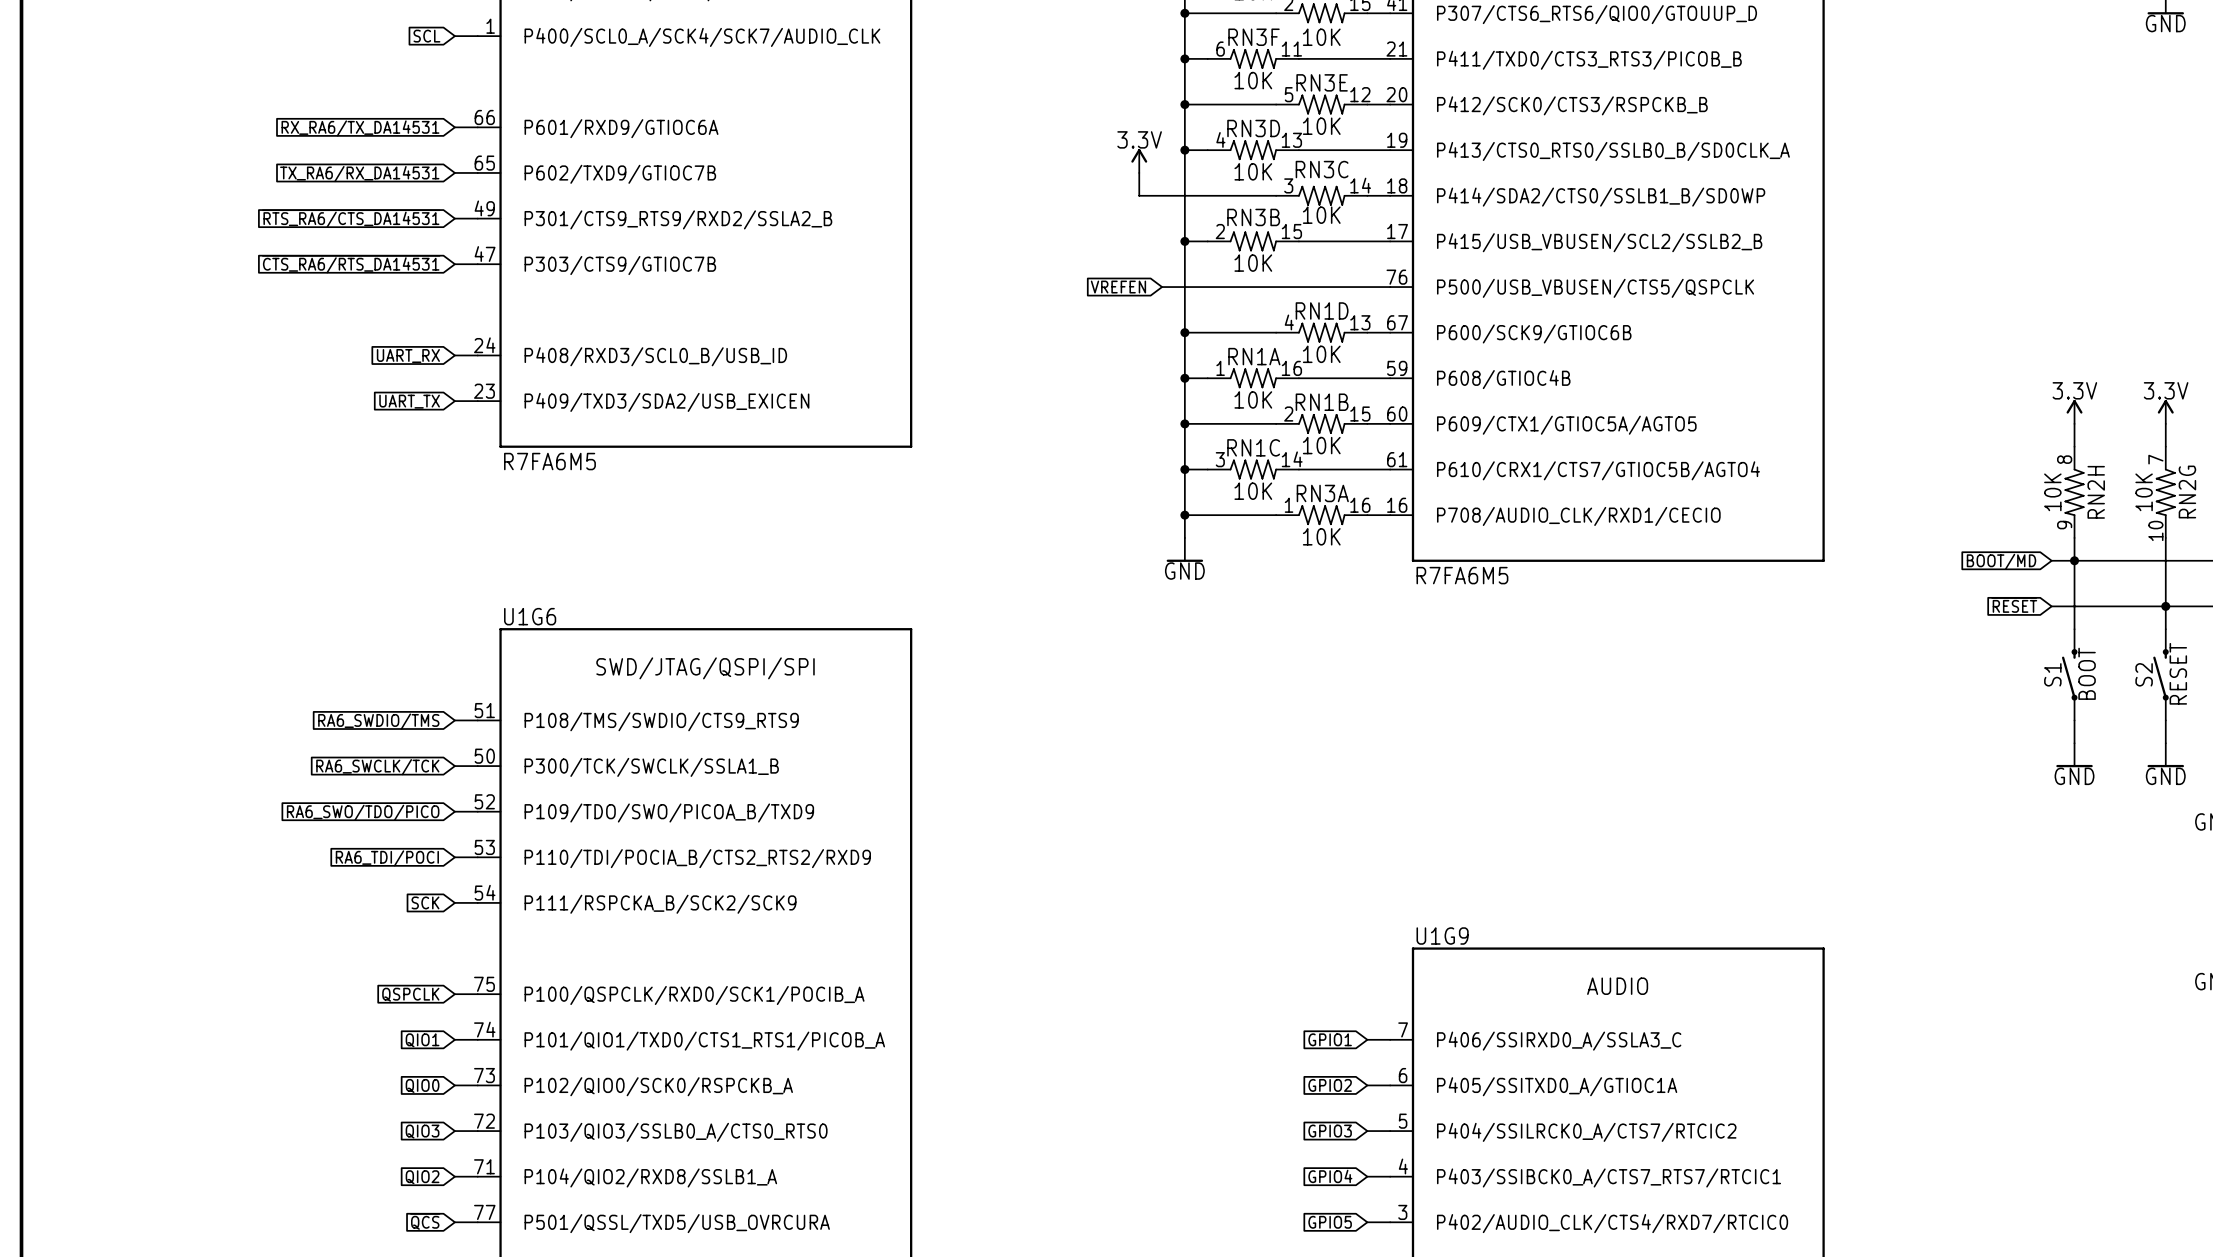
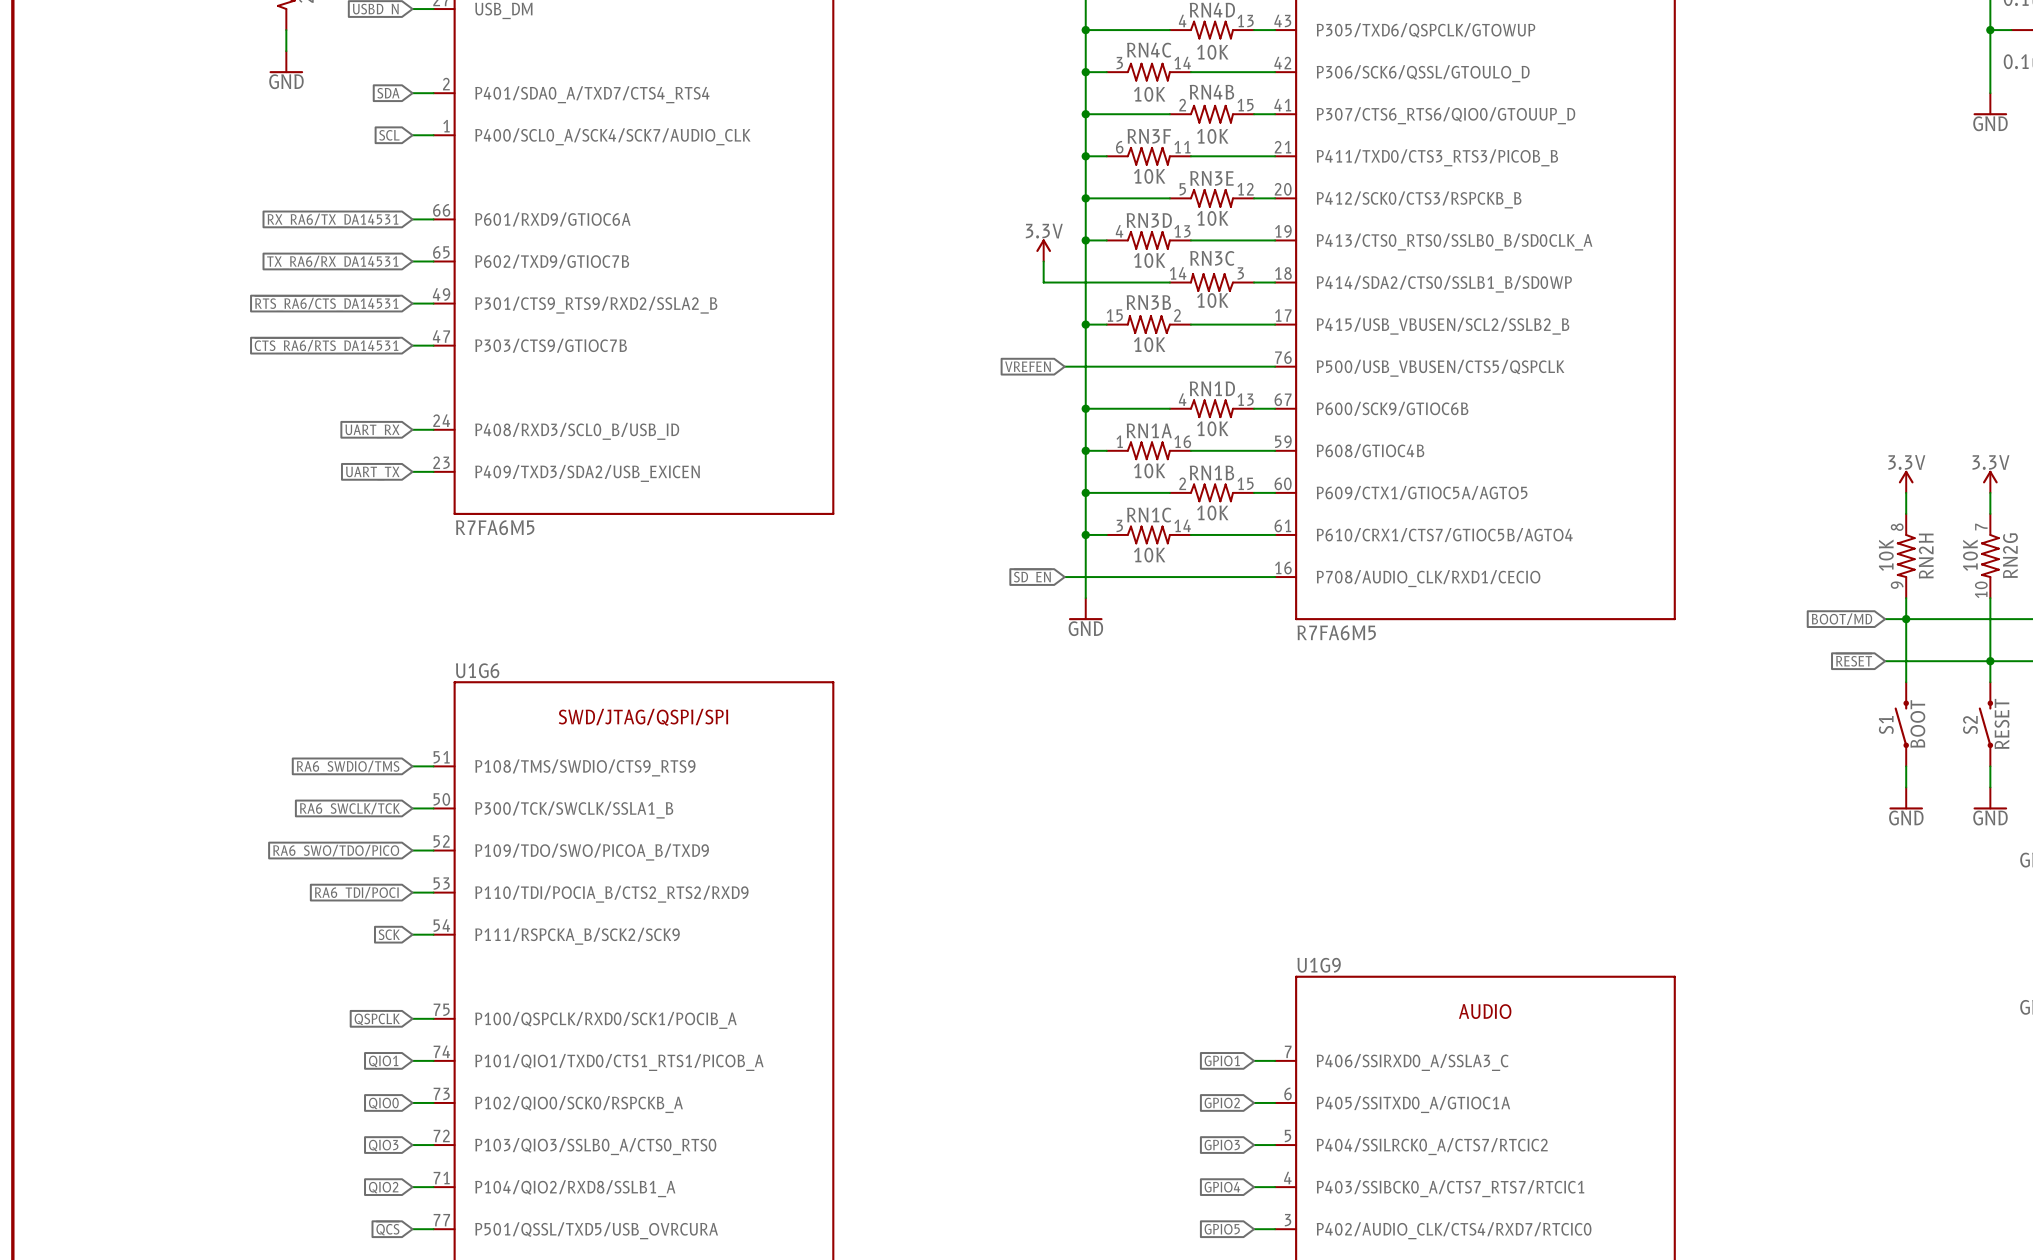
RN3C rotation: 0° (1321, 195) -> 180° (1211, 282)
RN3B rotation: 0° (1253, 241) -> 180° (1148, 324)
global label: none -> ~{SD_EN} (1032, 577)
wire: none -> (1064, 577) (1085, 577)
junction: (1184, 515) -> none
RN3A: 10K (1321, 515) -> none

